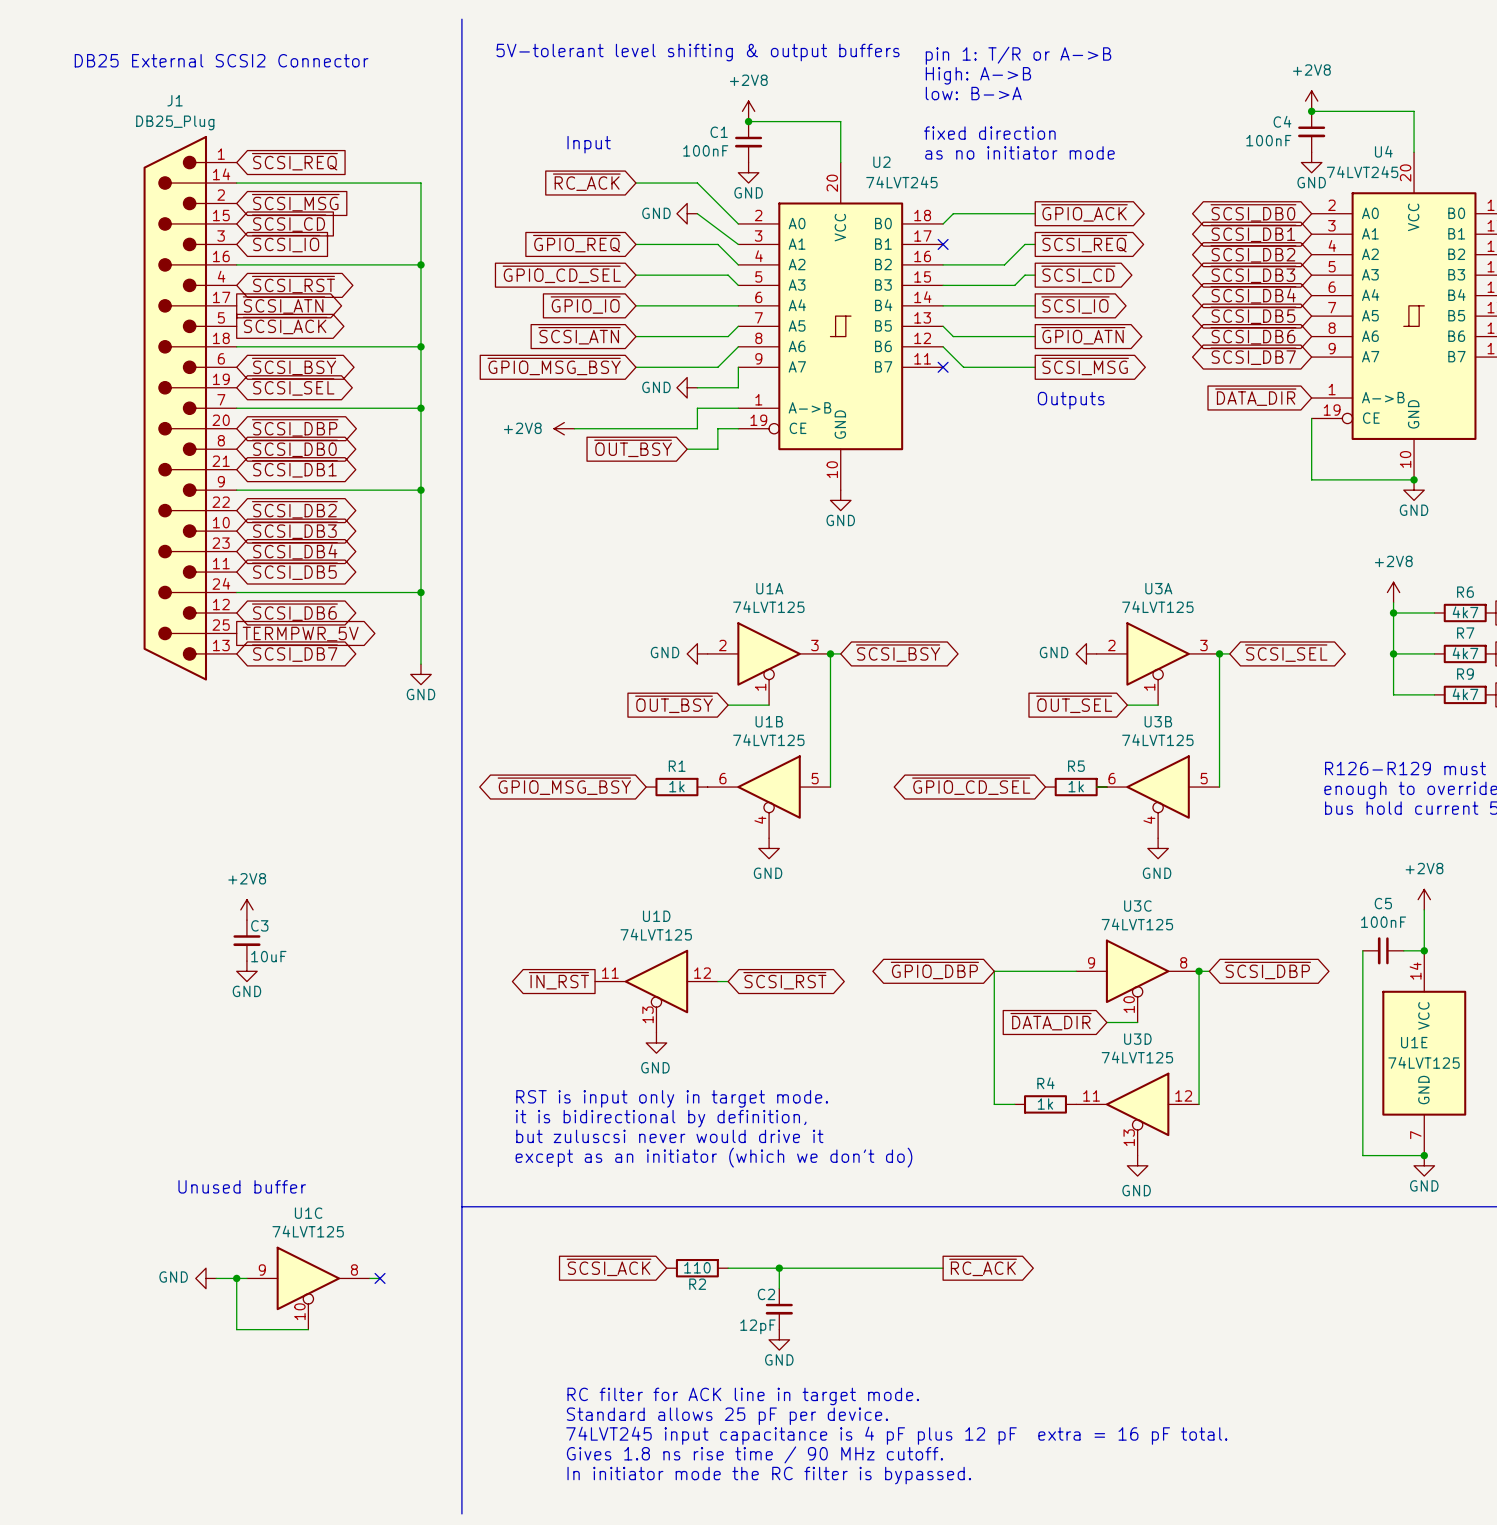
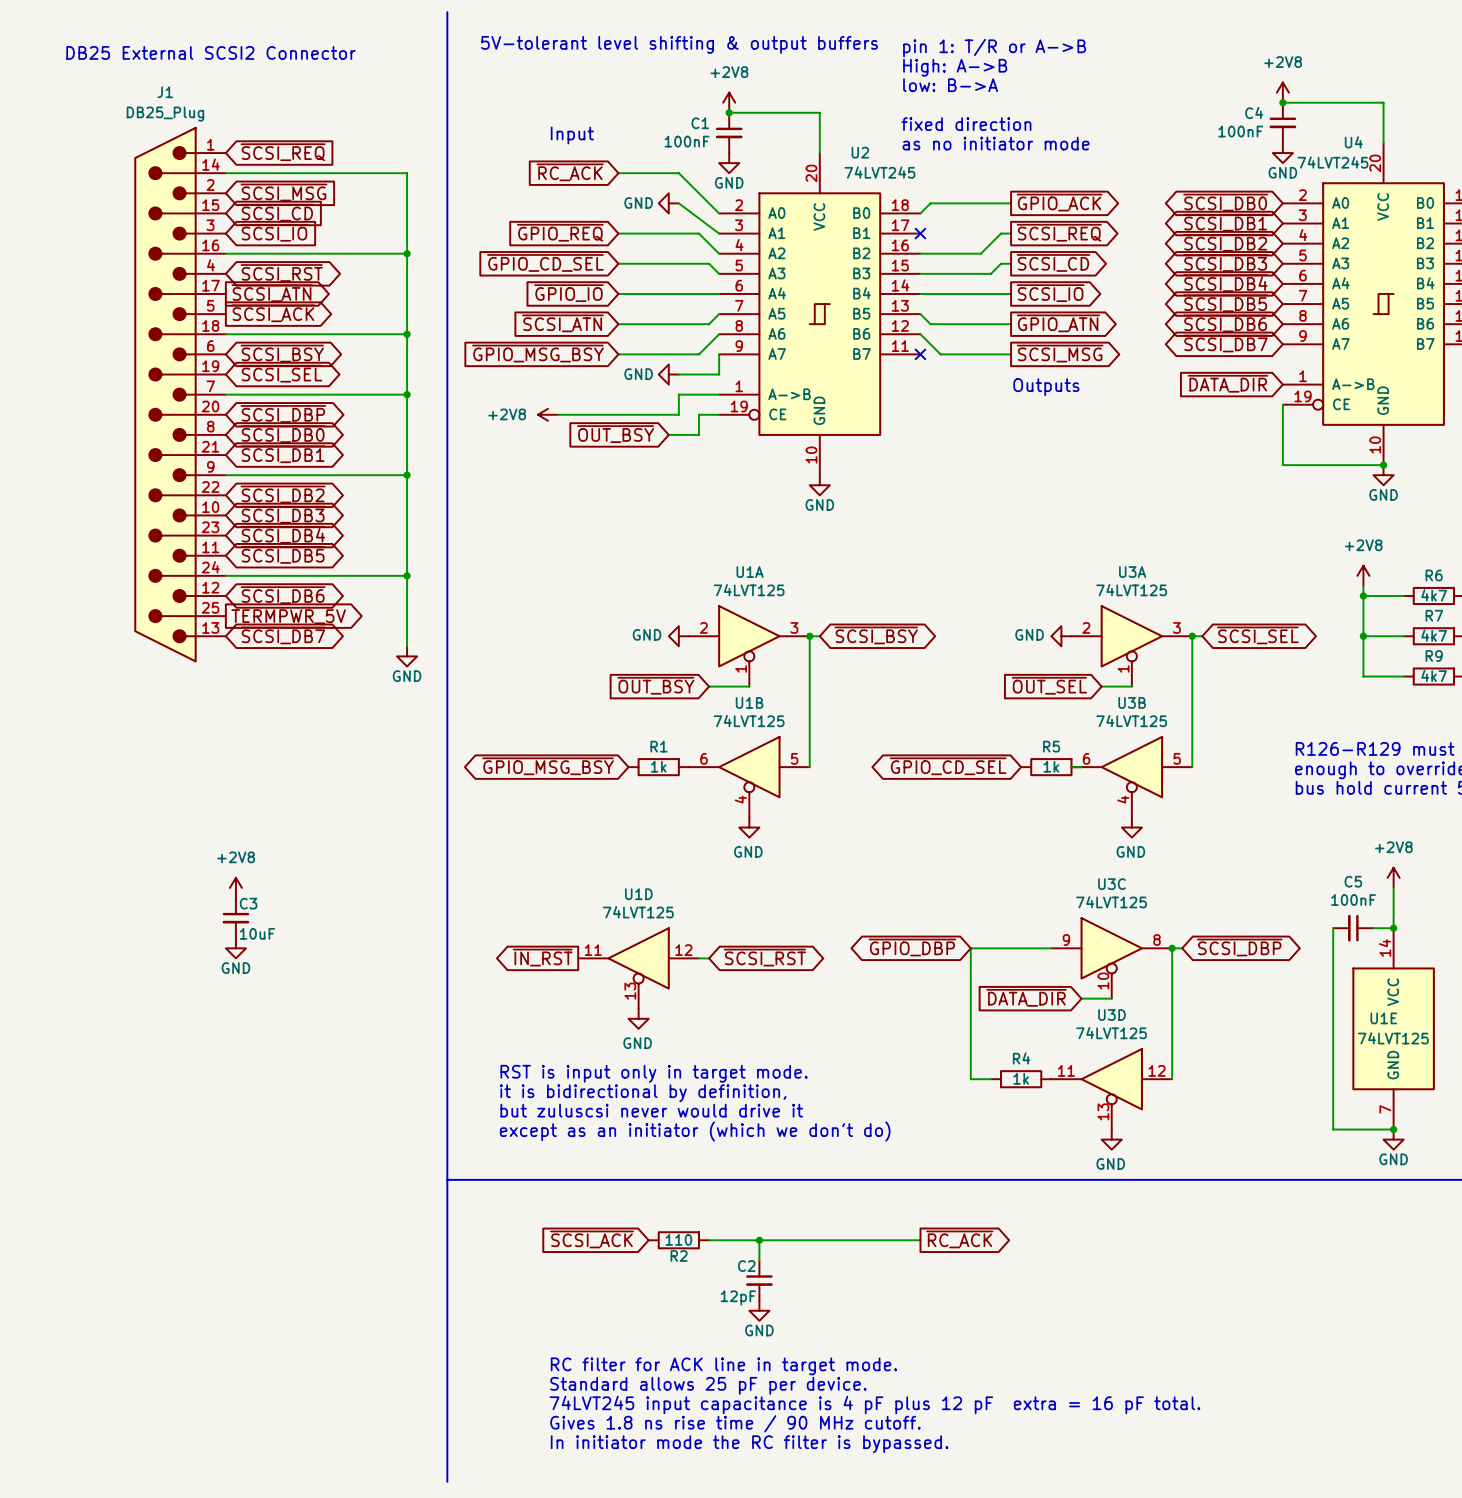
text: Unused buffer (242, 1186) -> none
power symbol: GND (206, 1278) -> none
wire: (216, 1278) (246, 1278) -> none
wire: (236, 1278) (236, 1329) (308, 1329) -> none
junction: (236, 1278) -> none
wire: (369, 1278) (380, 1278) -> none
no-connect mark: (380, 1278) -> none
U1C: 74LVT125 (308, 1288) -> none

